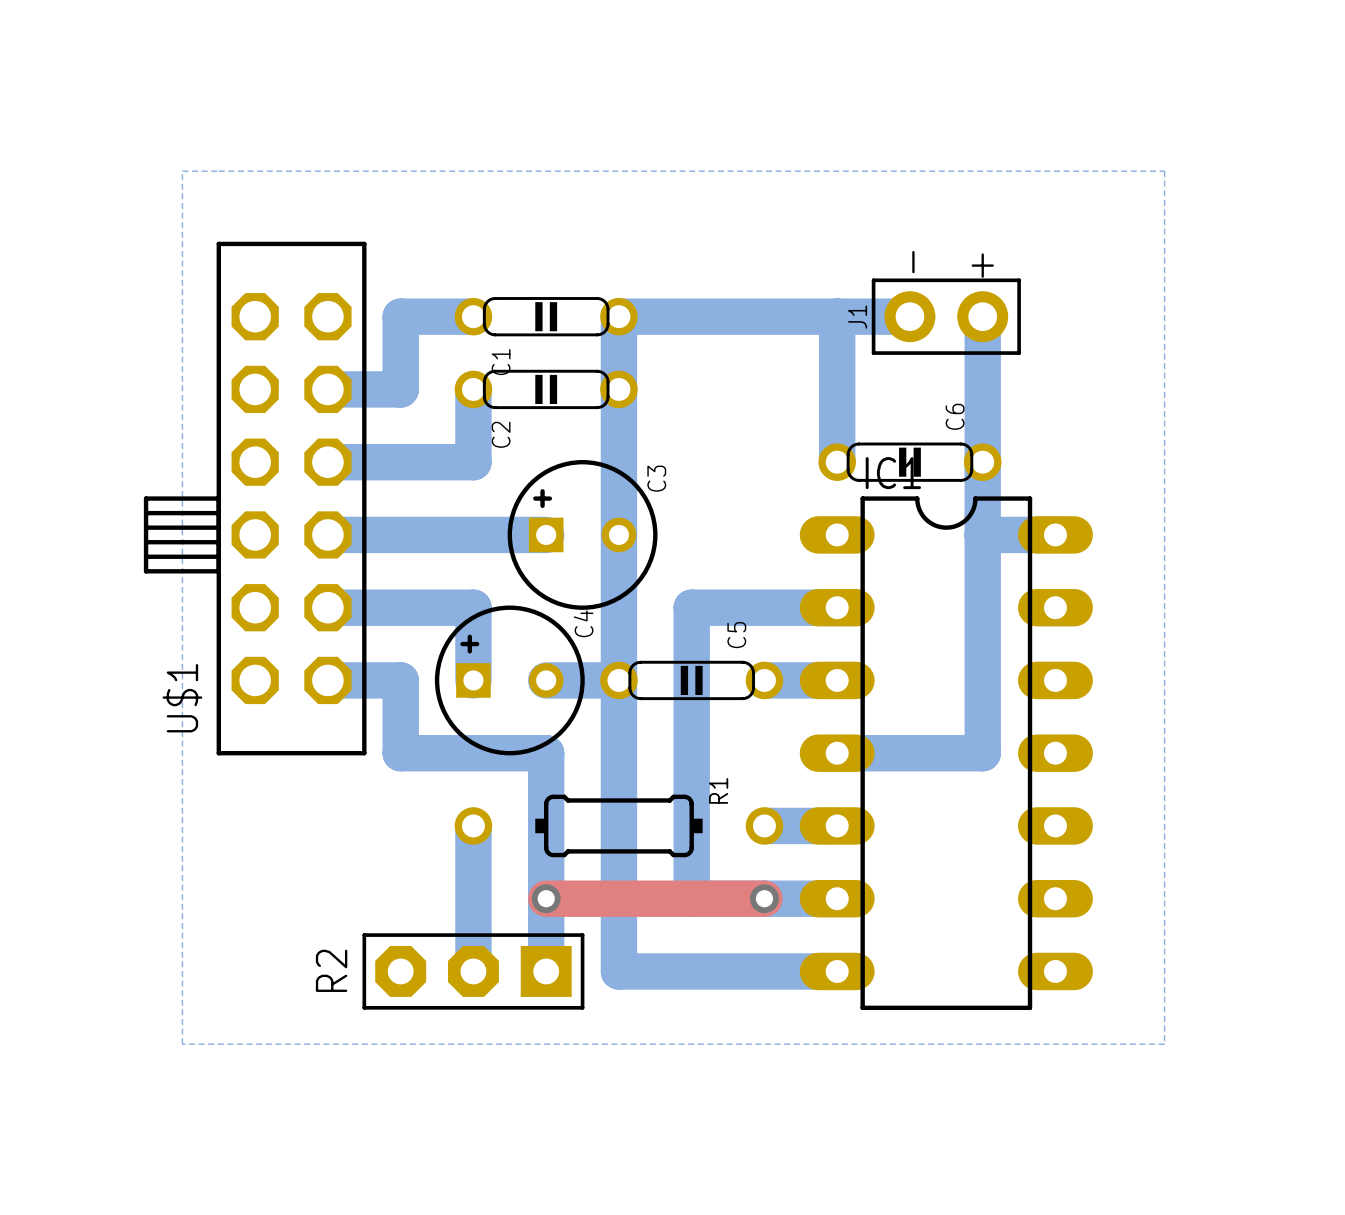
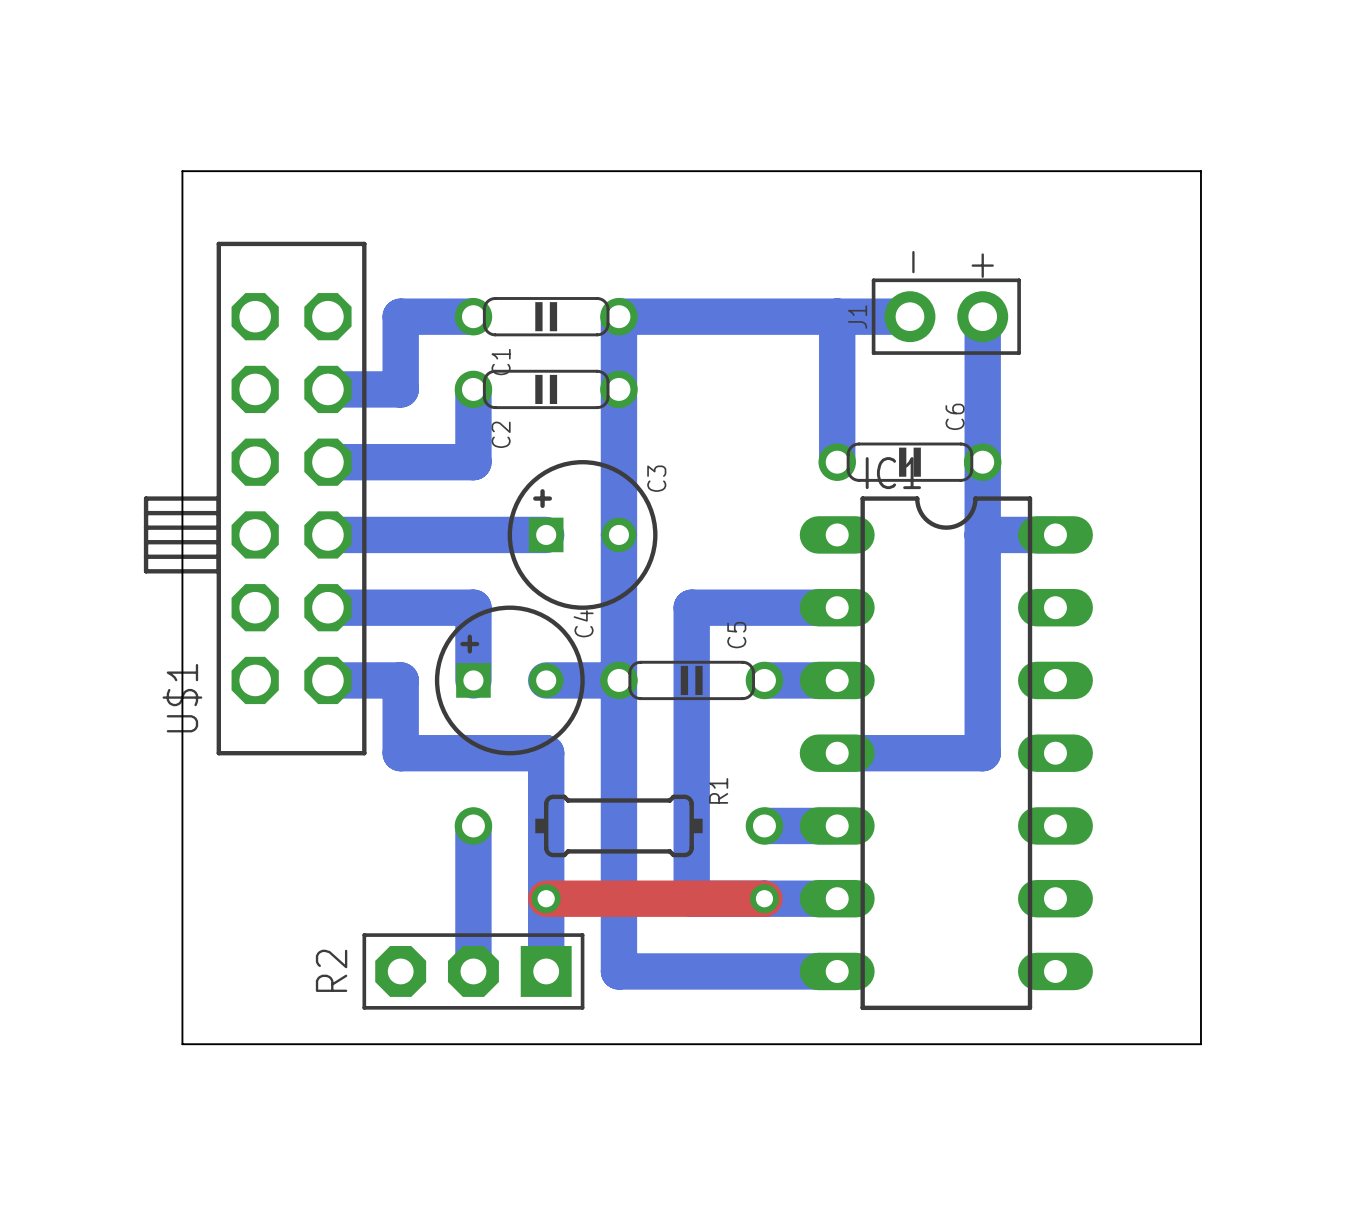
bottom zone outline: (182, 171) (182, 1044) (1164, 1044) (1164, 171) (182, 171) -> none
board edge: none -> (182, 171) (1200, 171) (1200, 1044) (182, 1044) (182, 171)

